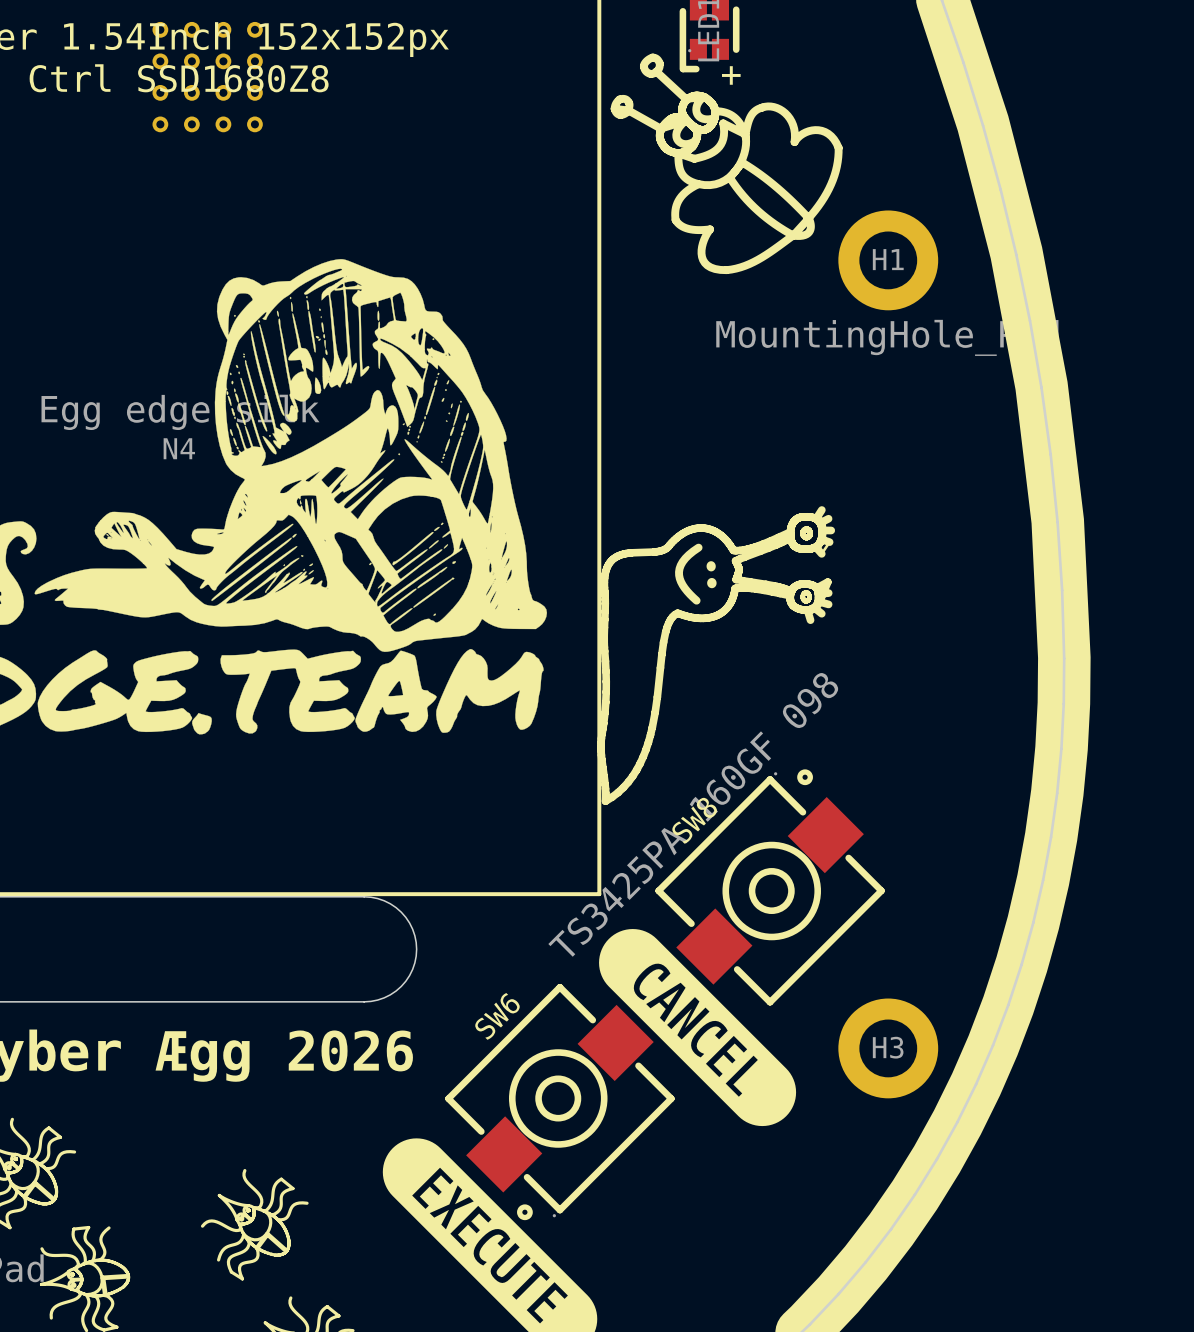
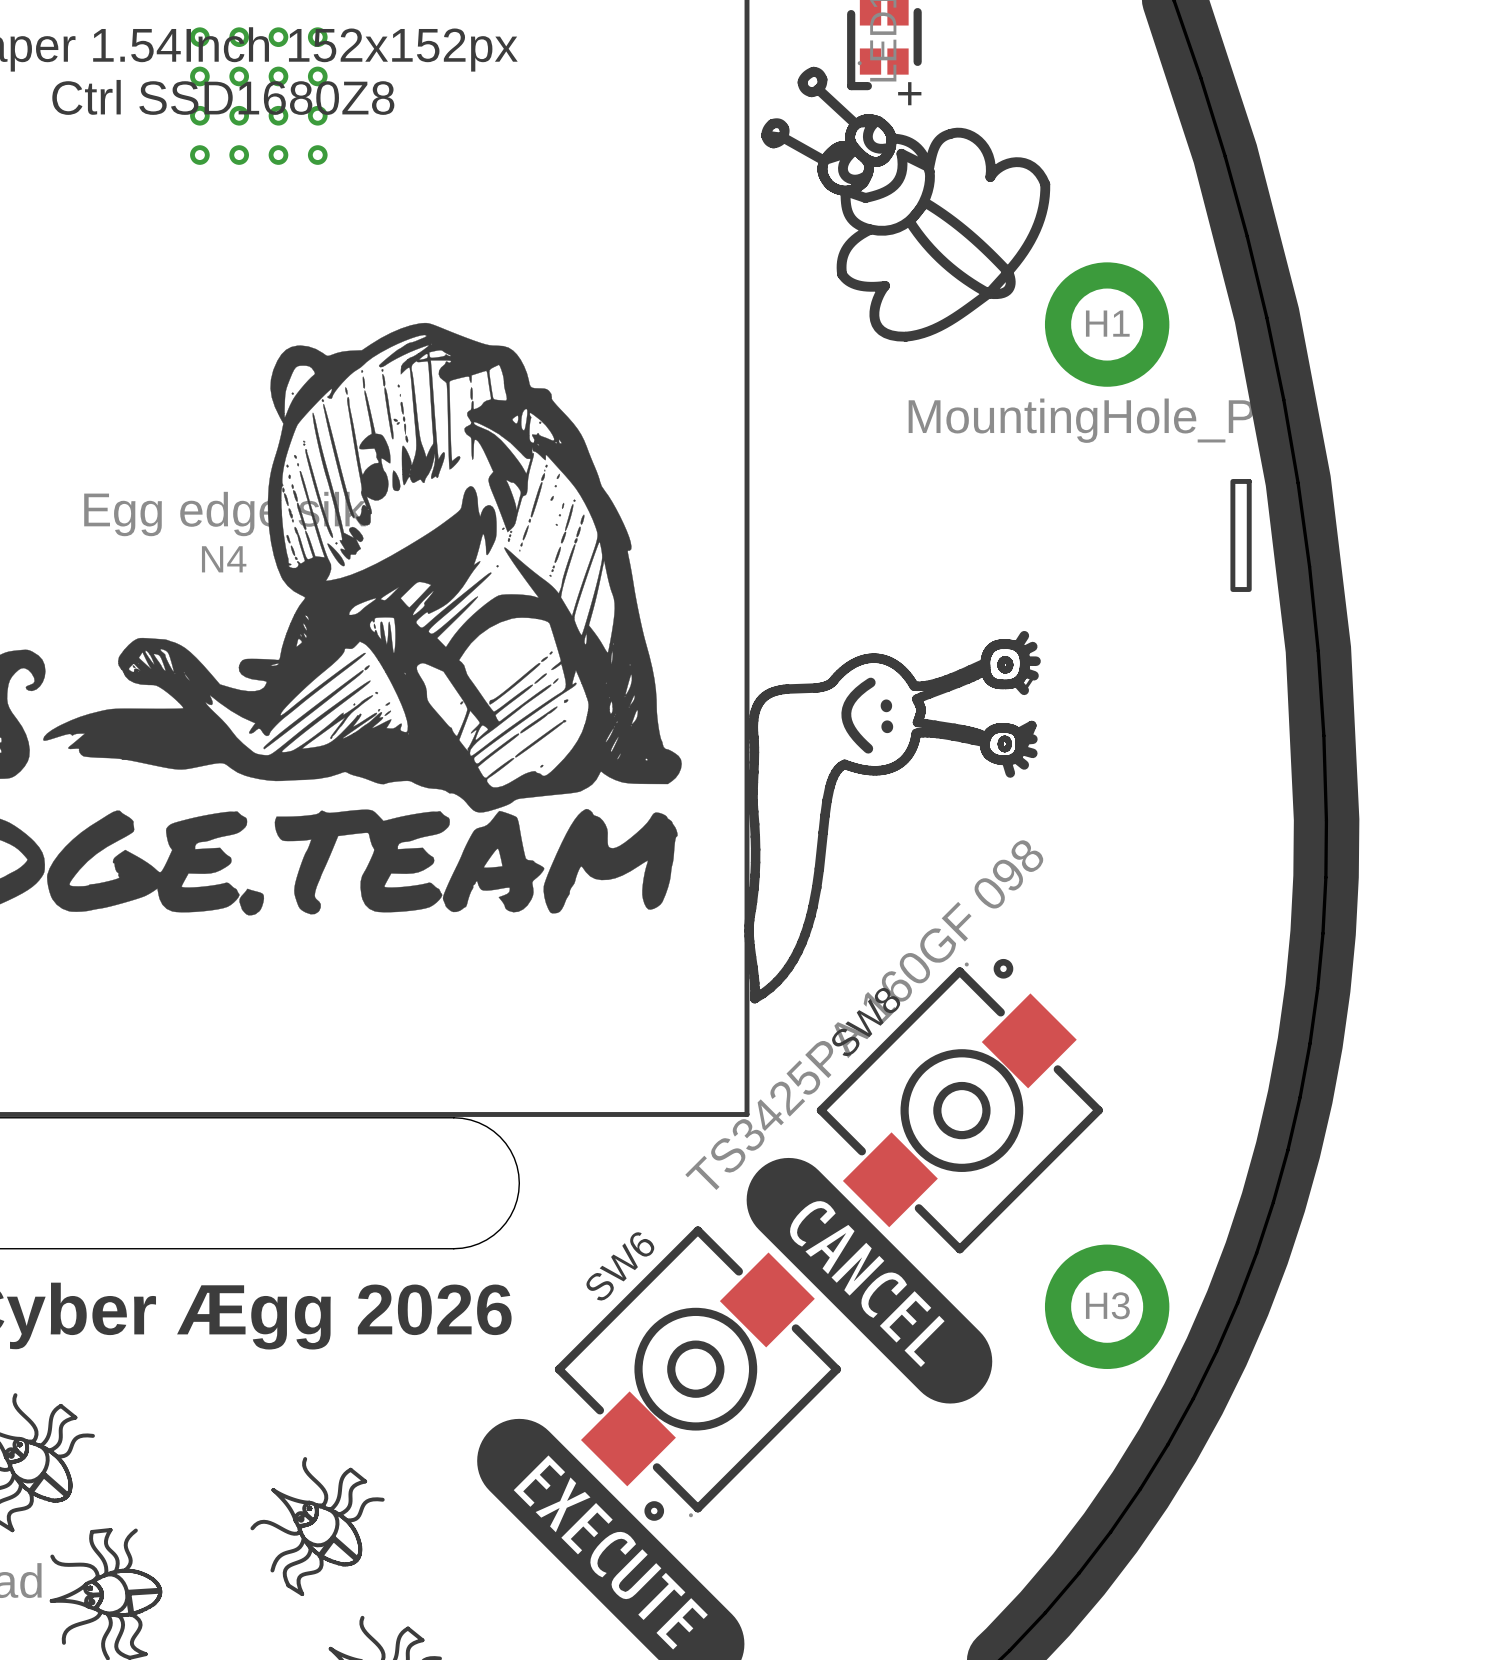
part: none -> (1241, 535)

